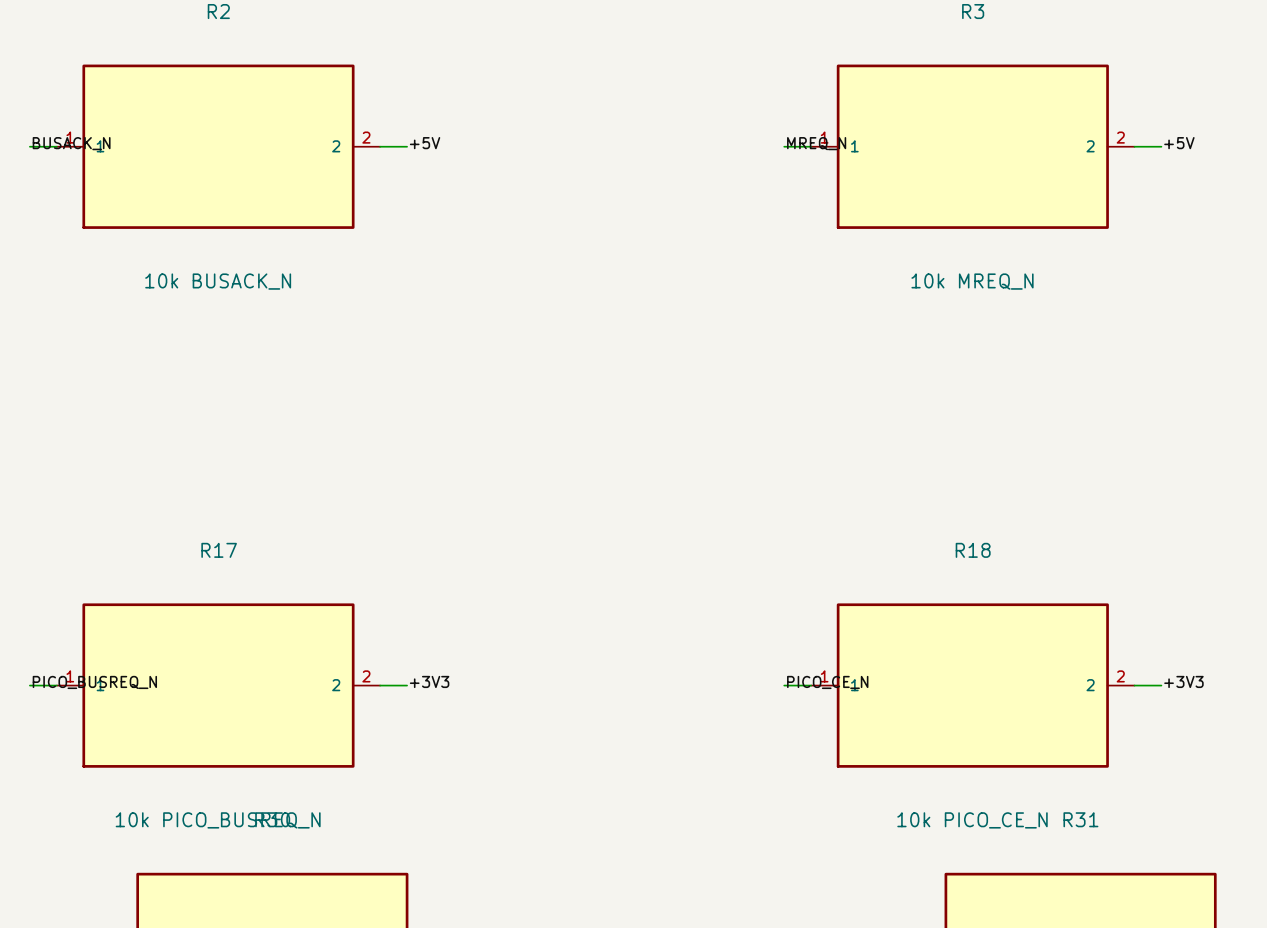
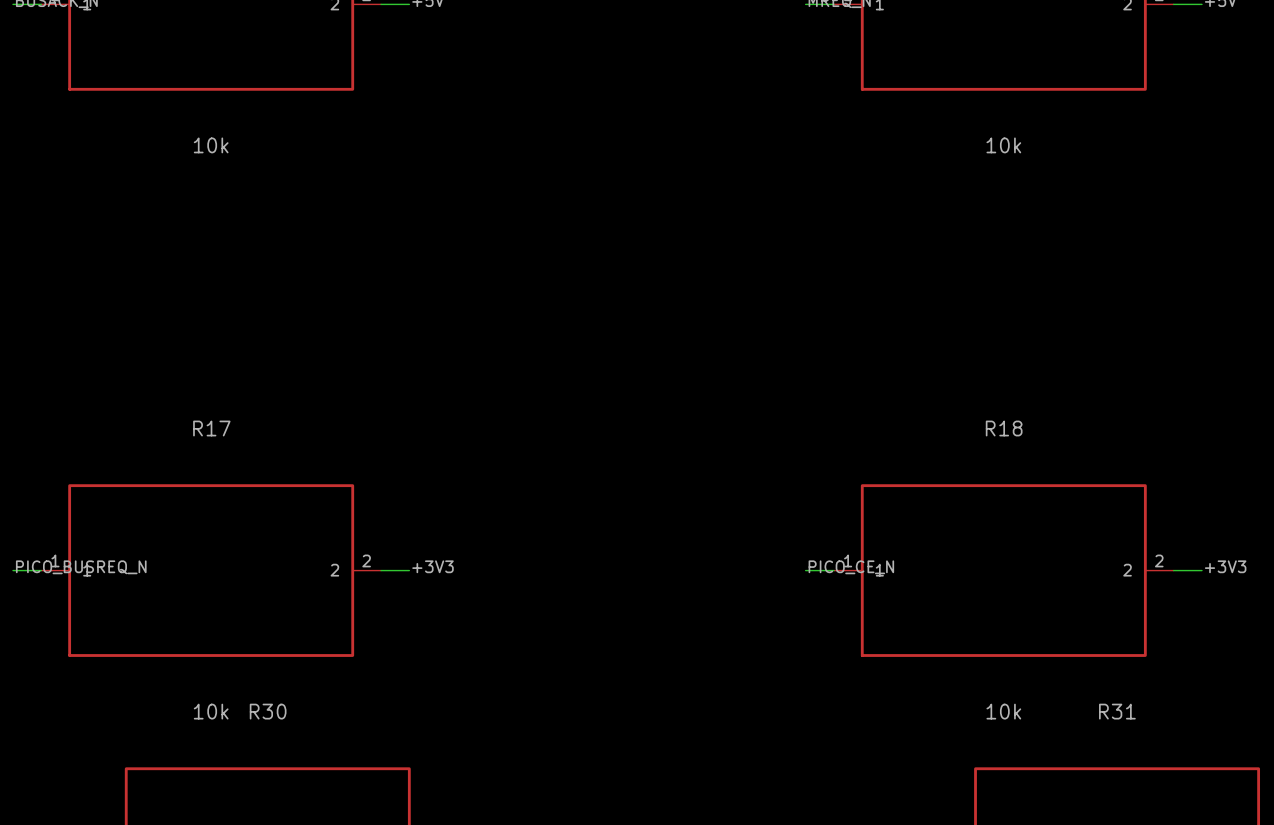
R2 value: 10k BUSACK_N (218, 281) -> 10k (211, 145)
R3 value: 10k MREQ_N (972, 281) -> 10k (1003, 145)
R17 value: 10k PICO_BUSREQ_N (218, 820) -> 10k (211, 711)
R18 value: 10k PICO_CE_N (972, 820) -> 10k (1003, 711)

